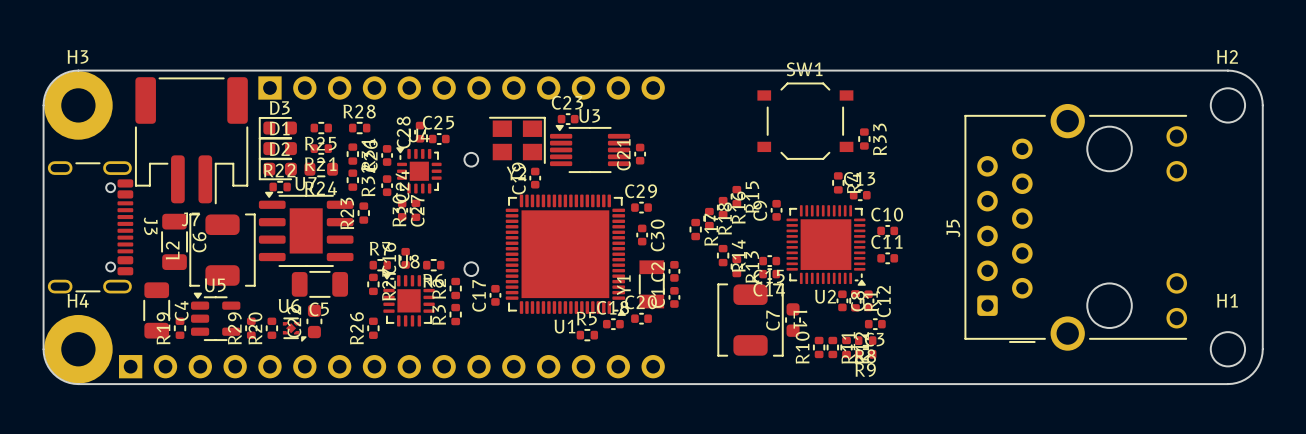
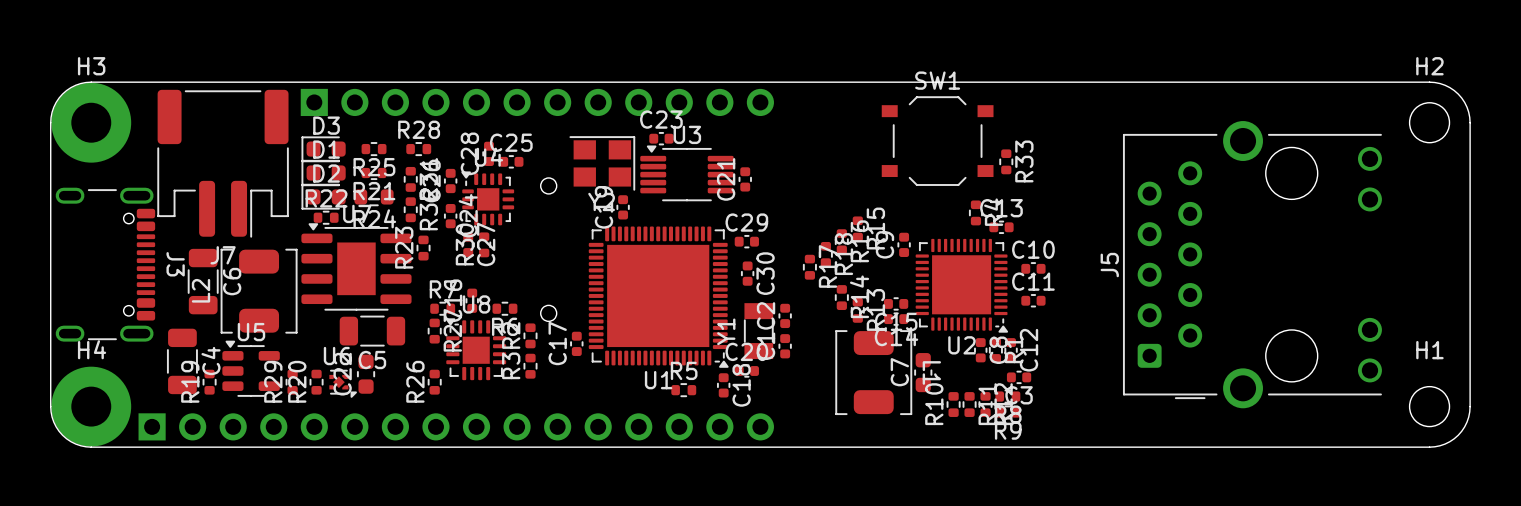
C18 rotation: 0° (613, 324) -> 90° clockwise (723, 385)

